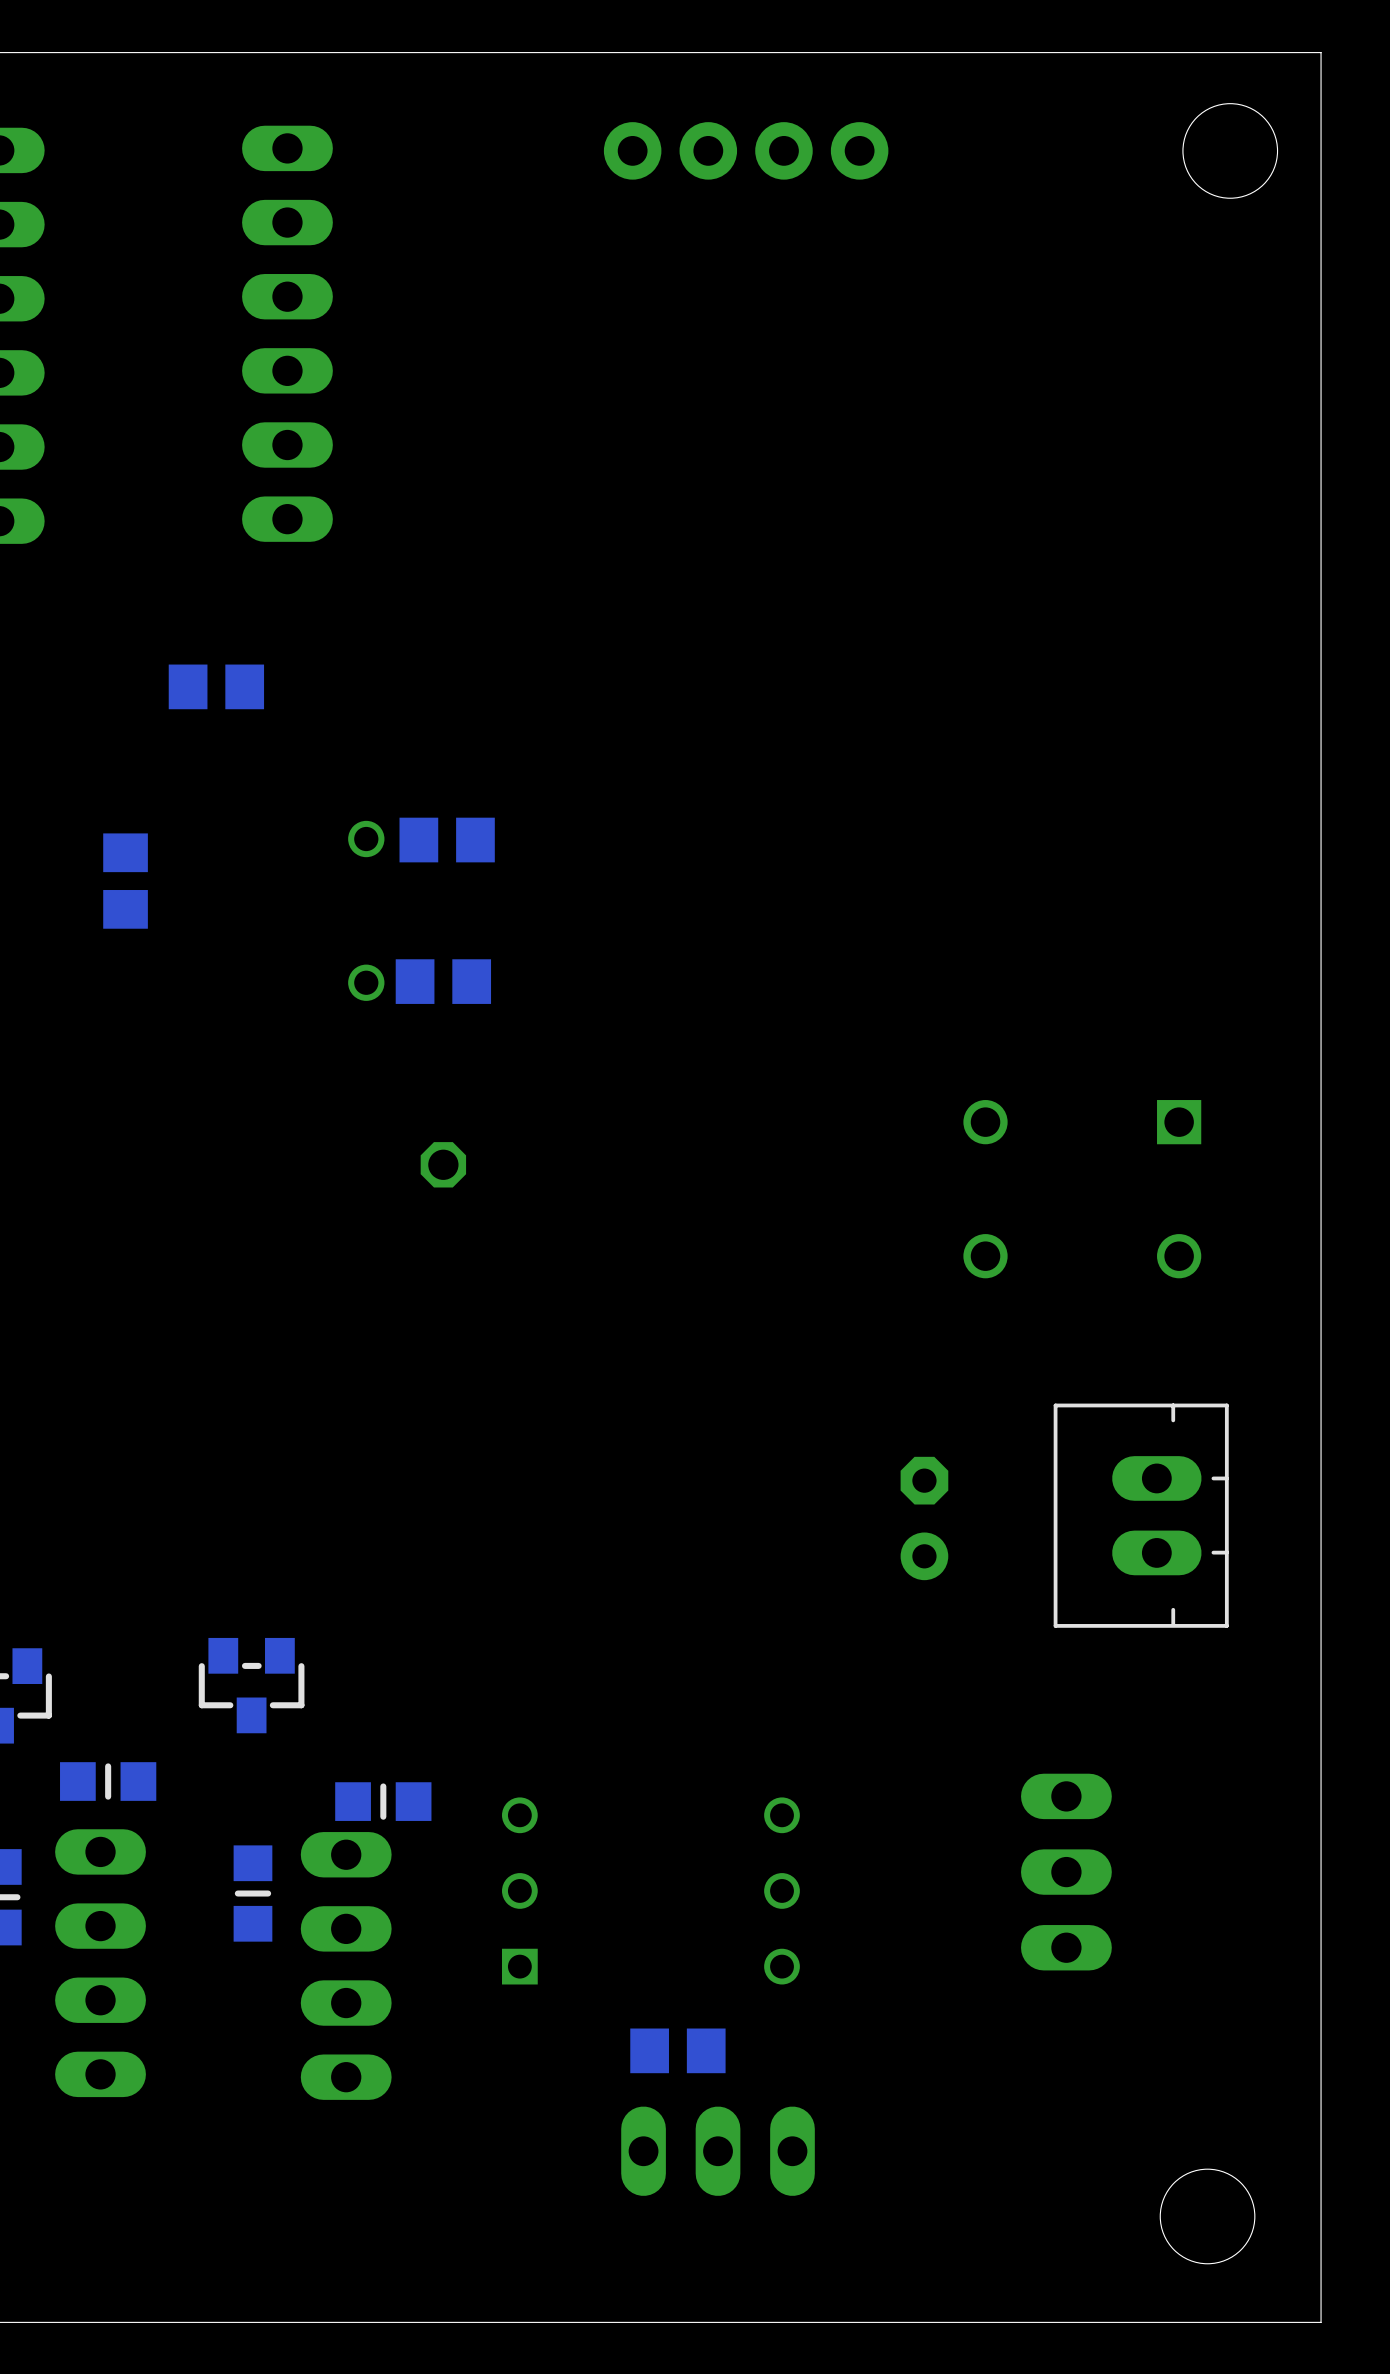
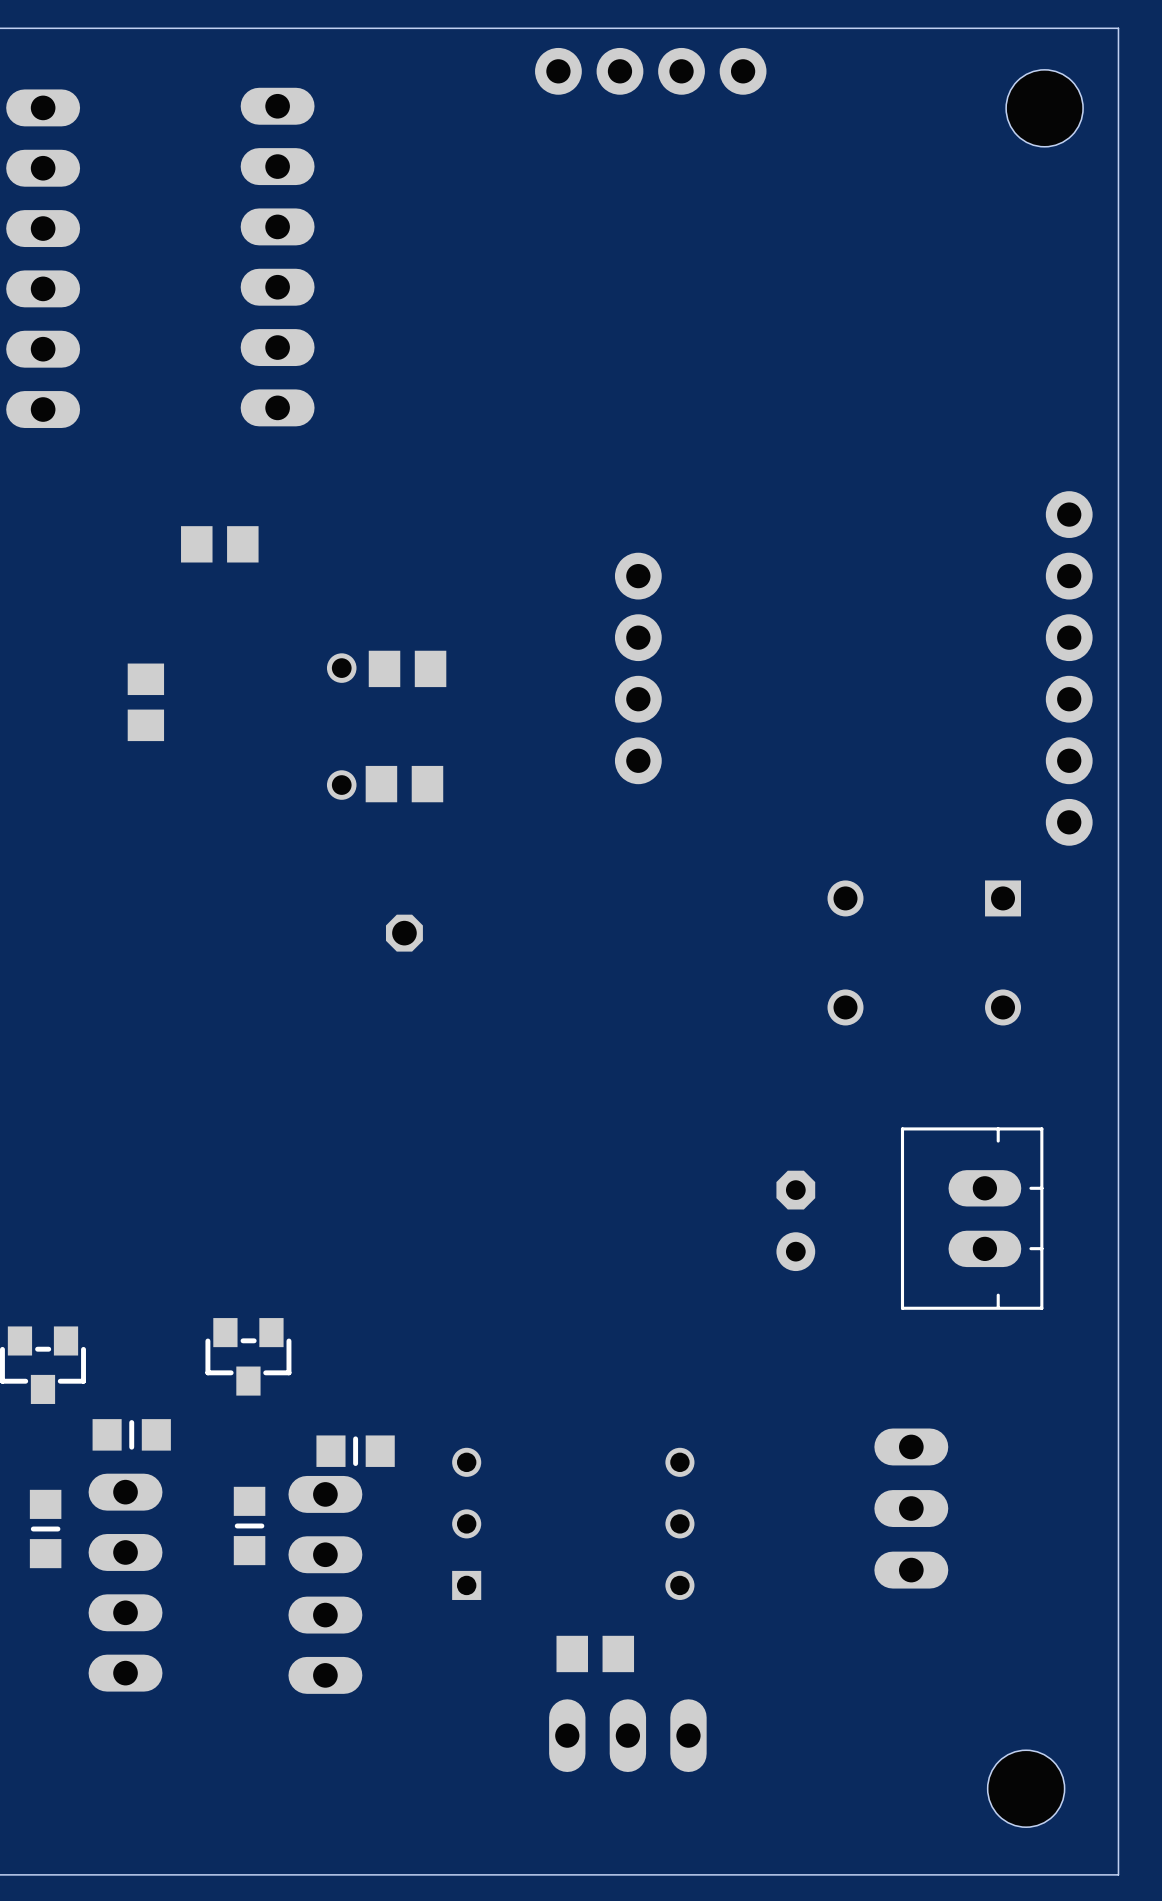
part position: (746, 150) -> (650, 71)
part: none -> (638, 668)
part: none -> (1069, 668)

